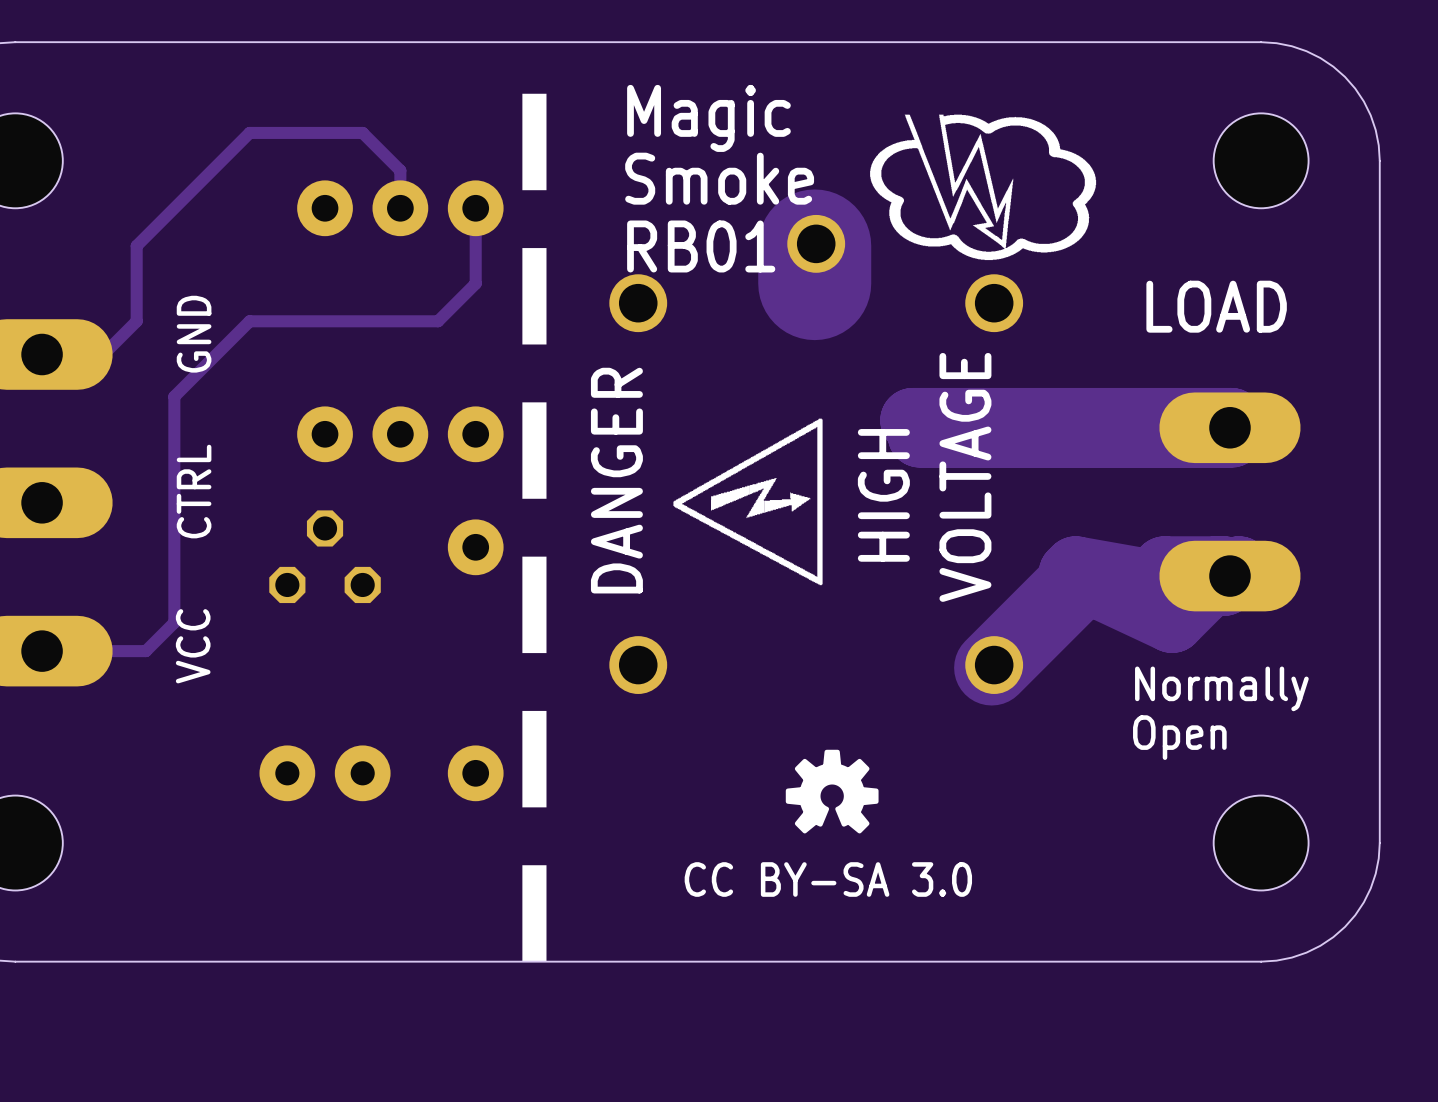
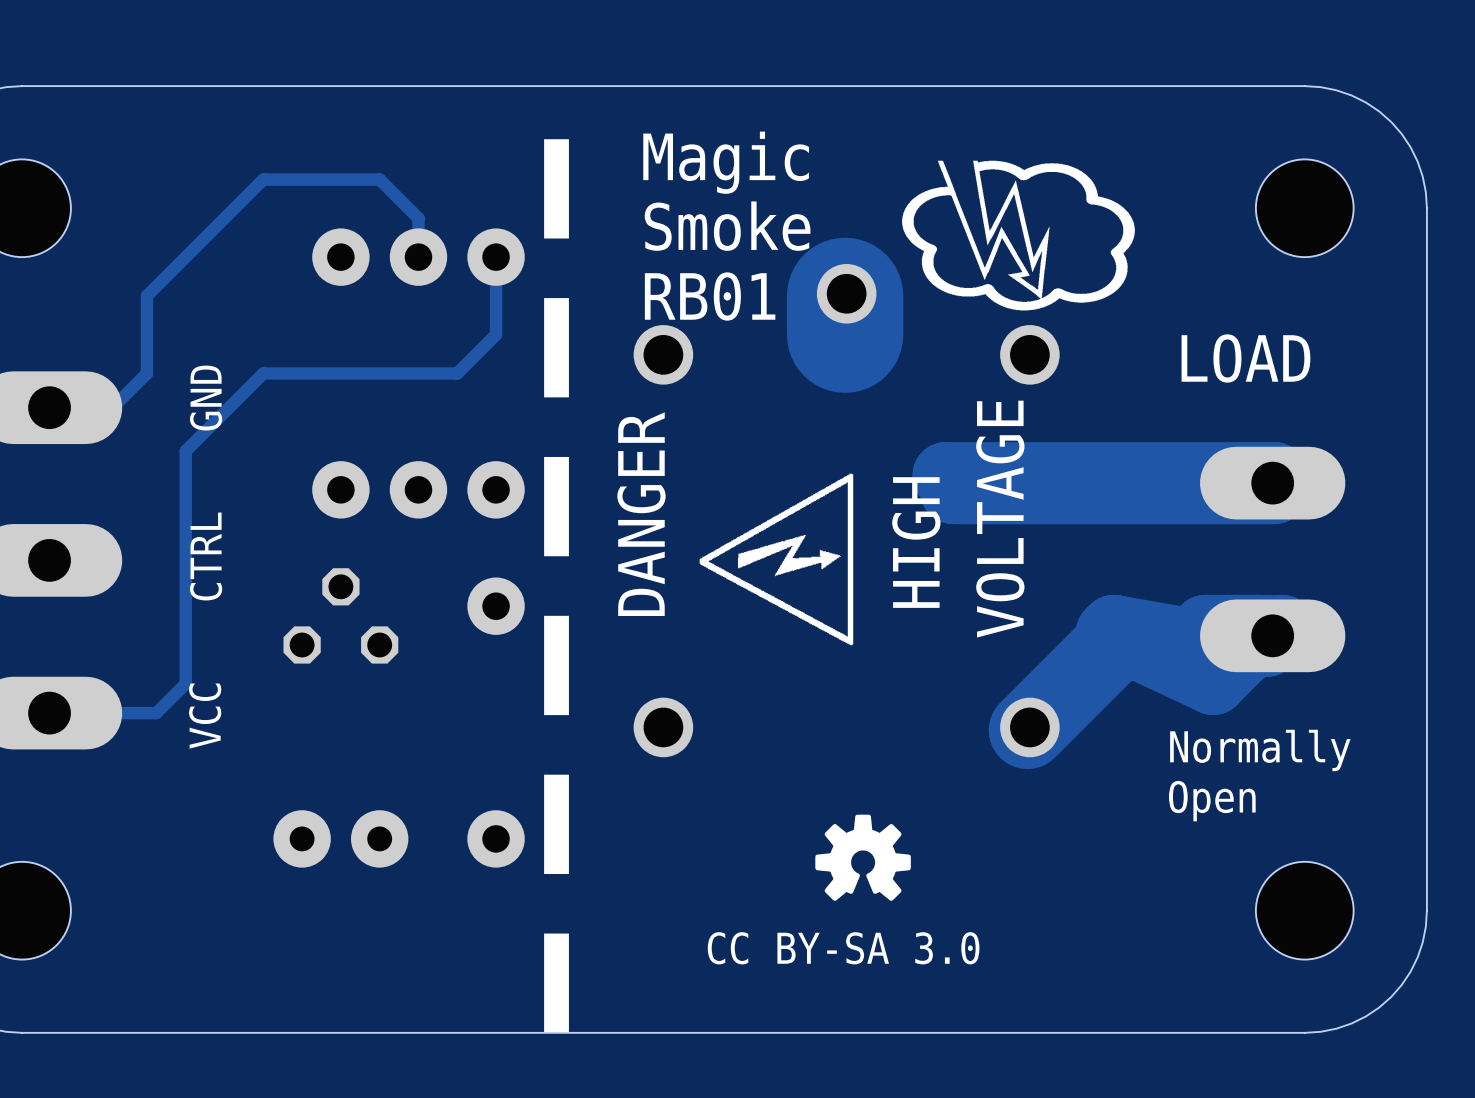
drawing: none -> [777, 542, 794, 571]

